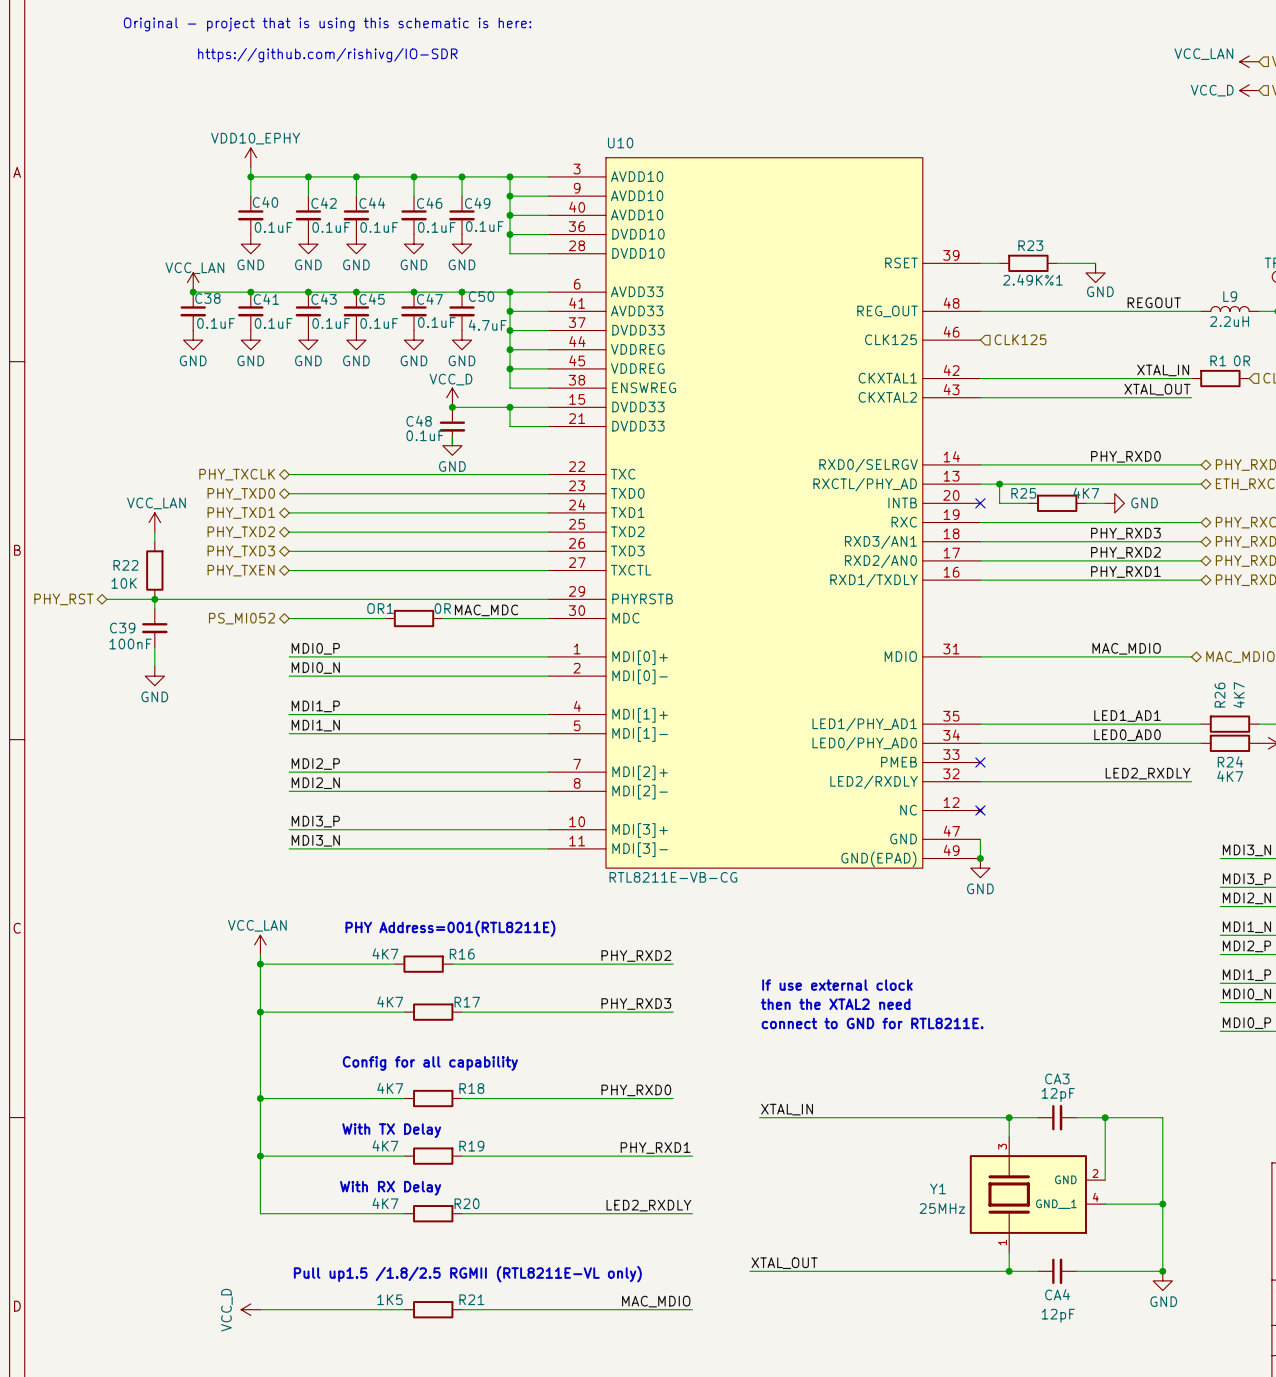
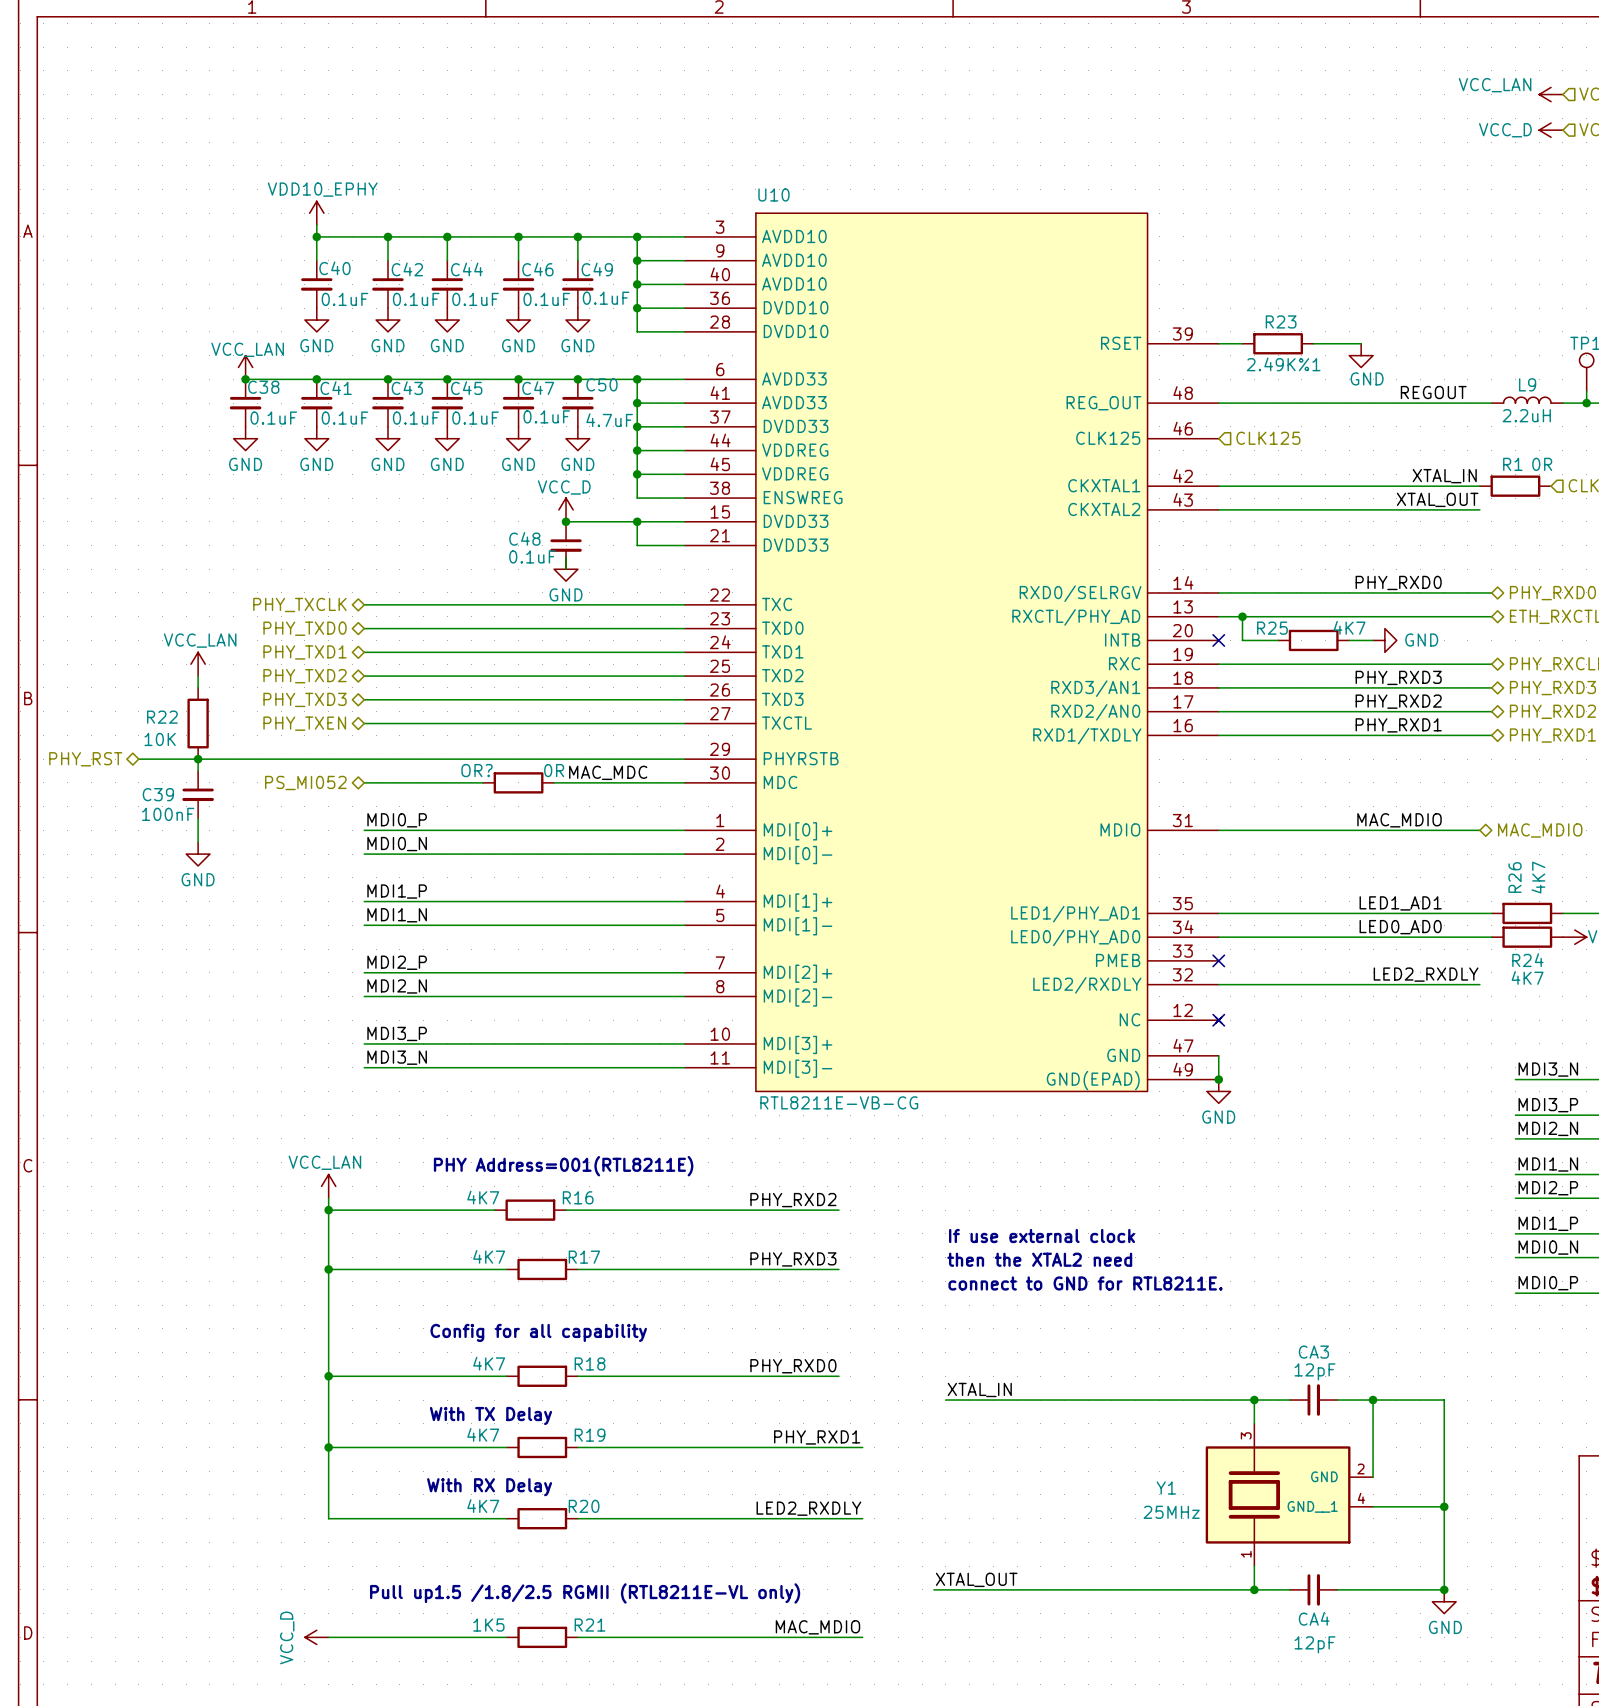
text: Original - project that is using this schematic is here: (327, 24) -> none
text: https://github.com/rishivg/IO-SDR (327, 55) -> none
OR1 name: OR1 (380, 608) -> OR? (477, 770)

